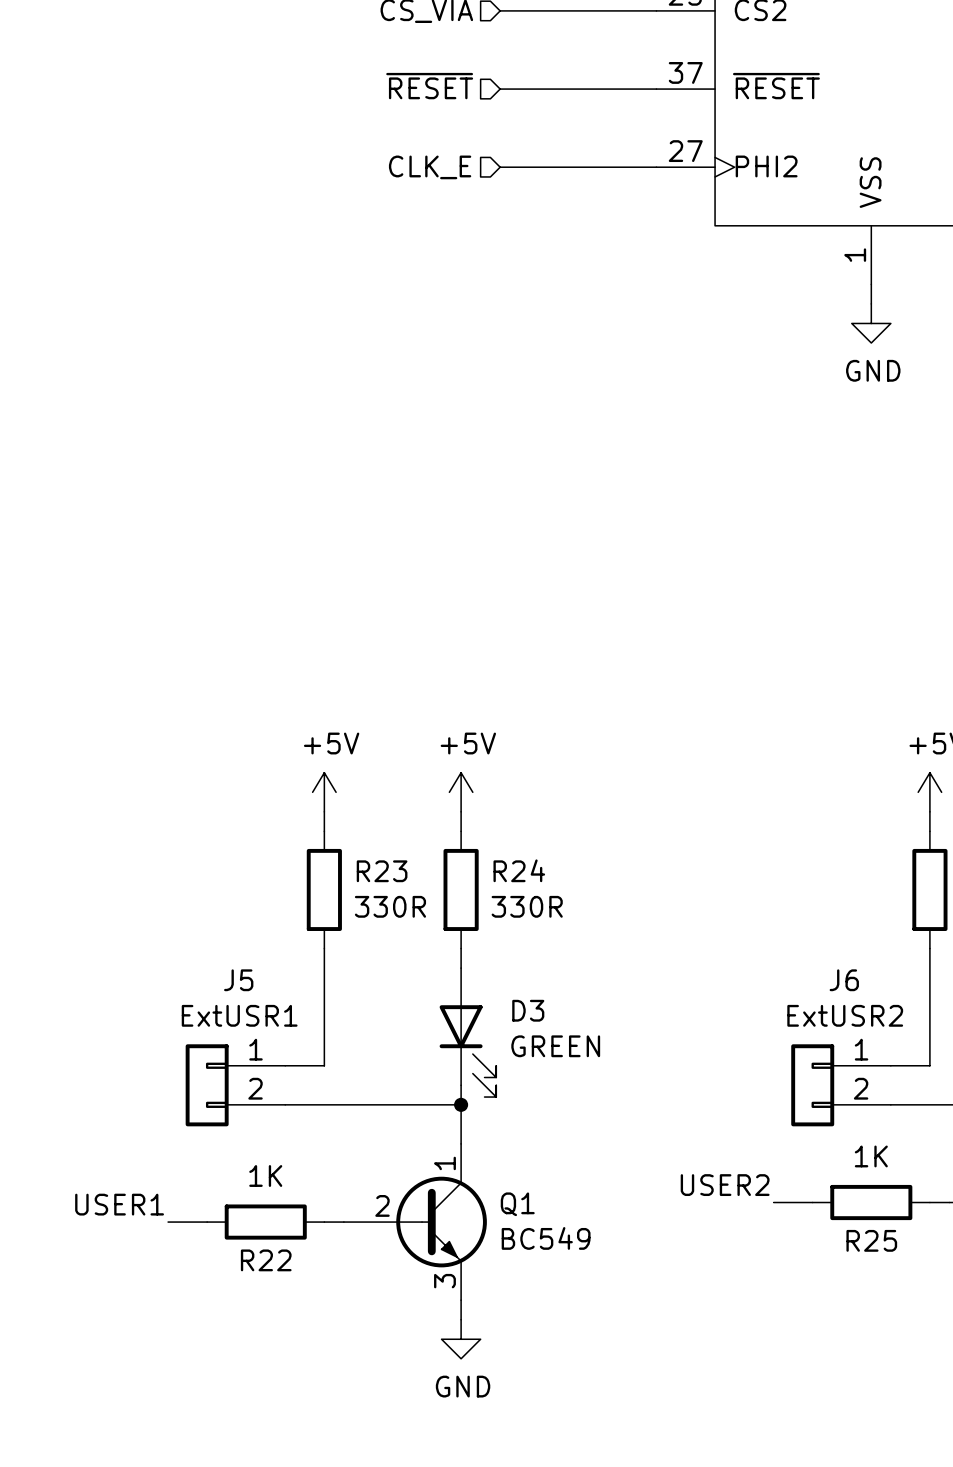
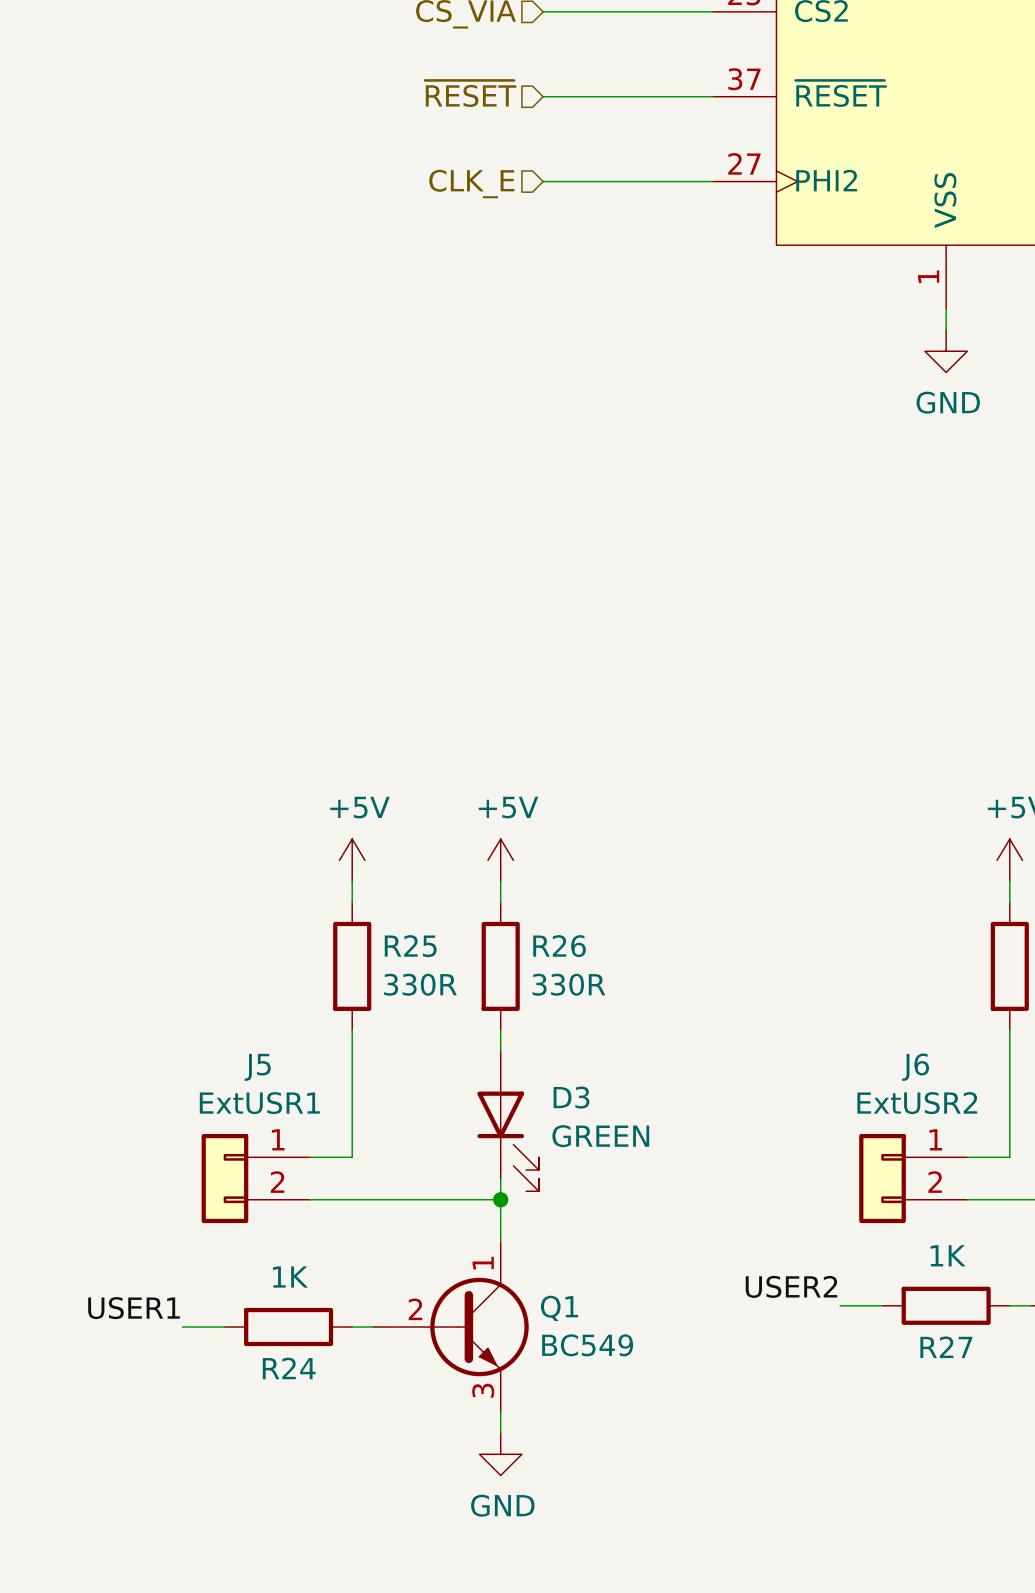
R24 name: R24 (519, 870) -> R26 (559, 946)
R23 name: R23 (382, 871) -> R25 (410, 946)
R25 name: R25 (871, 1240) -> R27 (946, 1347)
R22 name: R22 (266, 1260) -> R24 (289, 1368)

